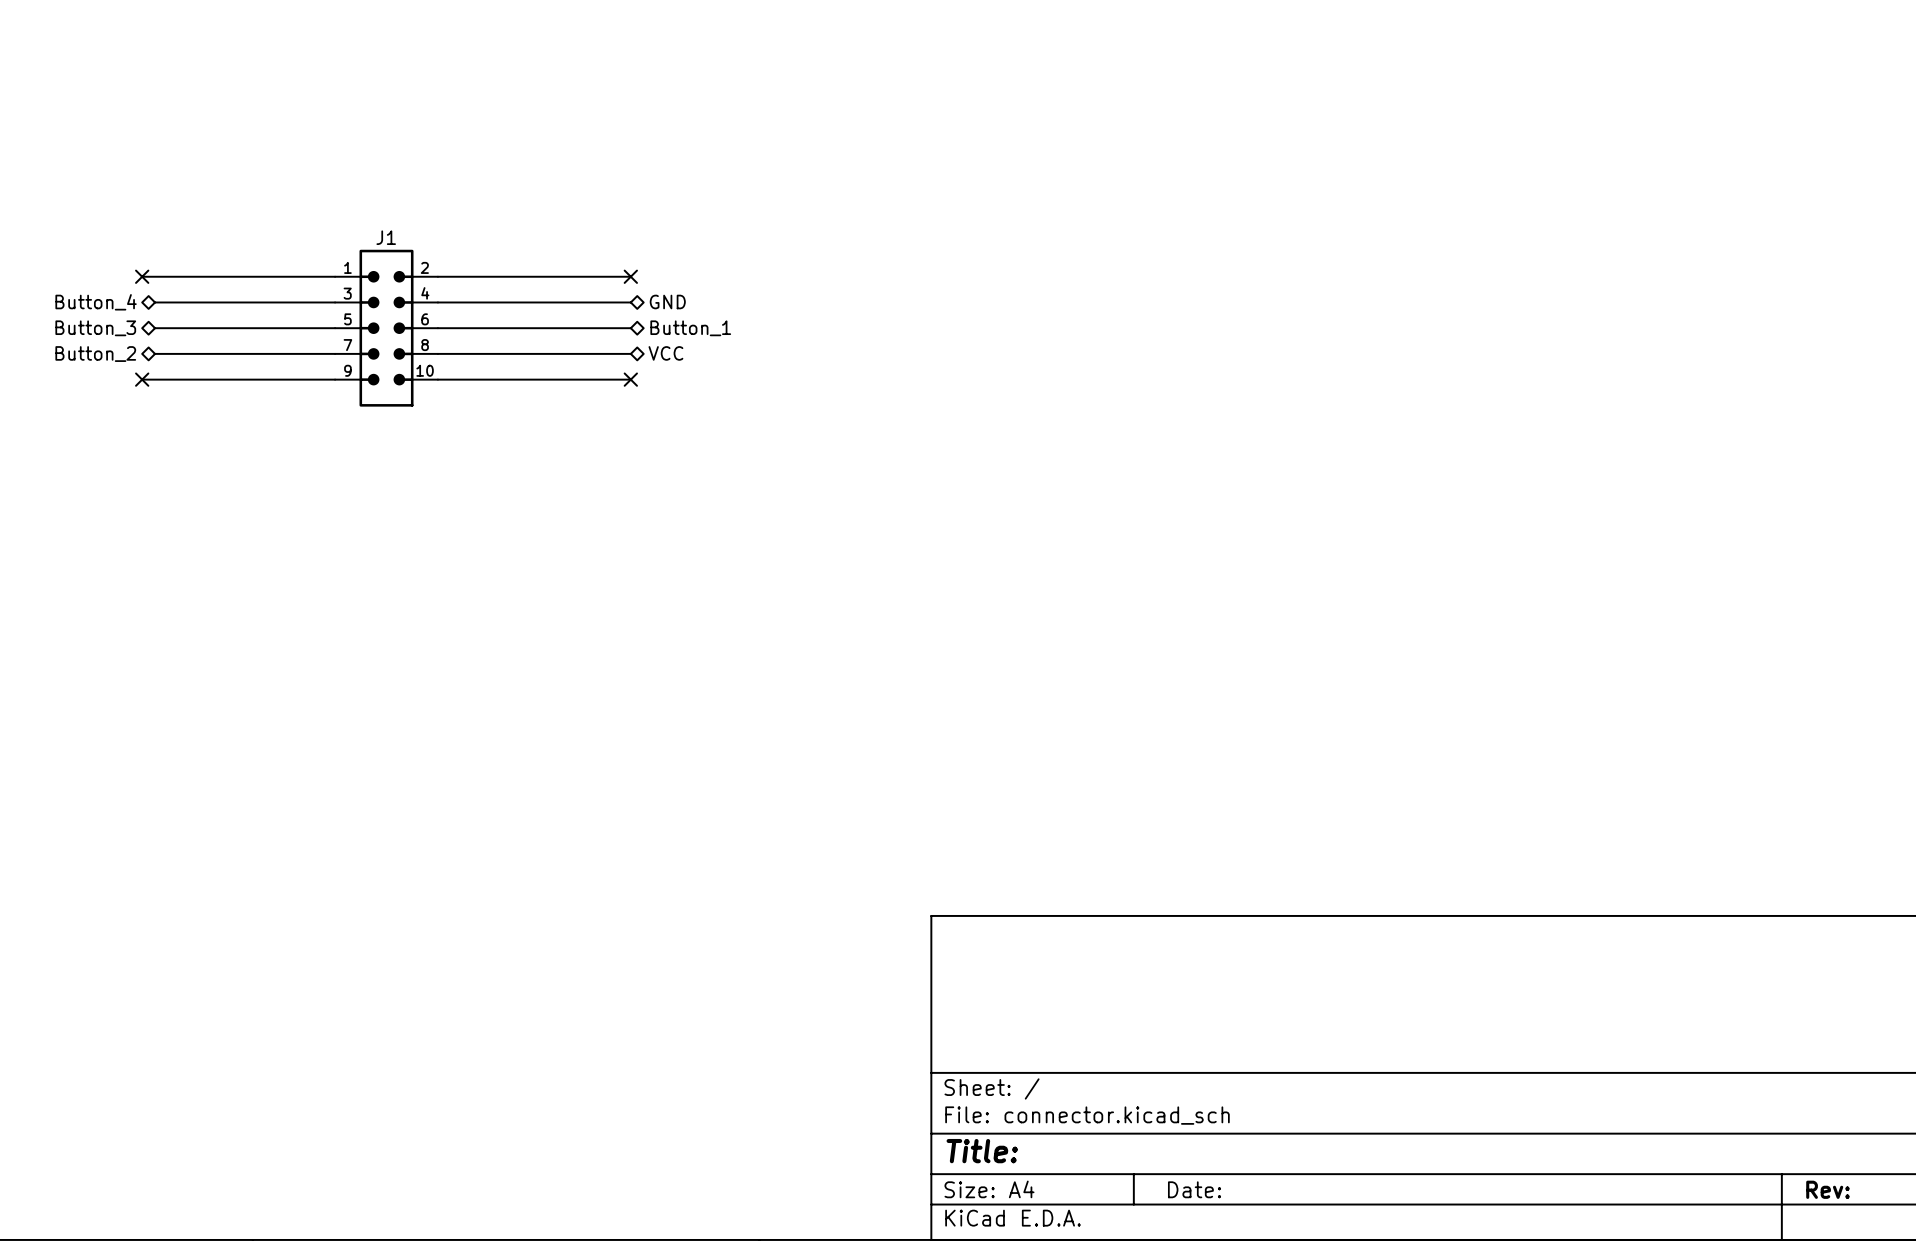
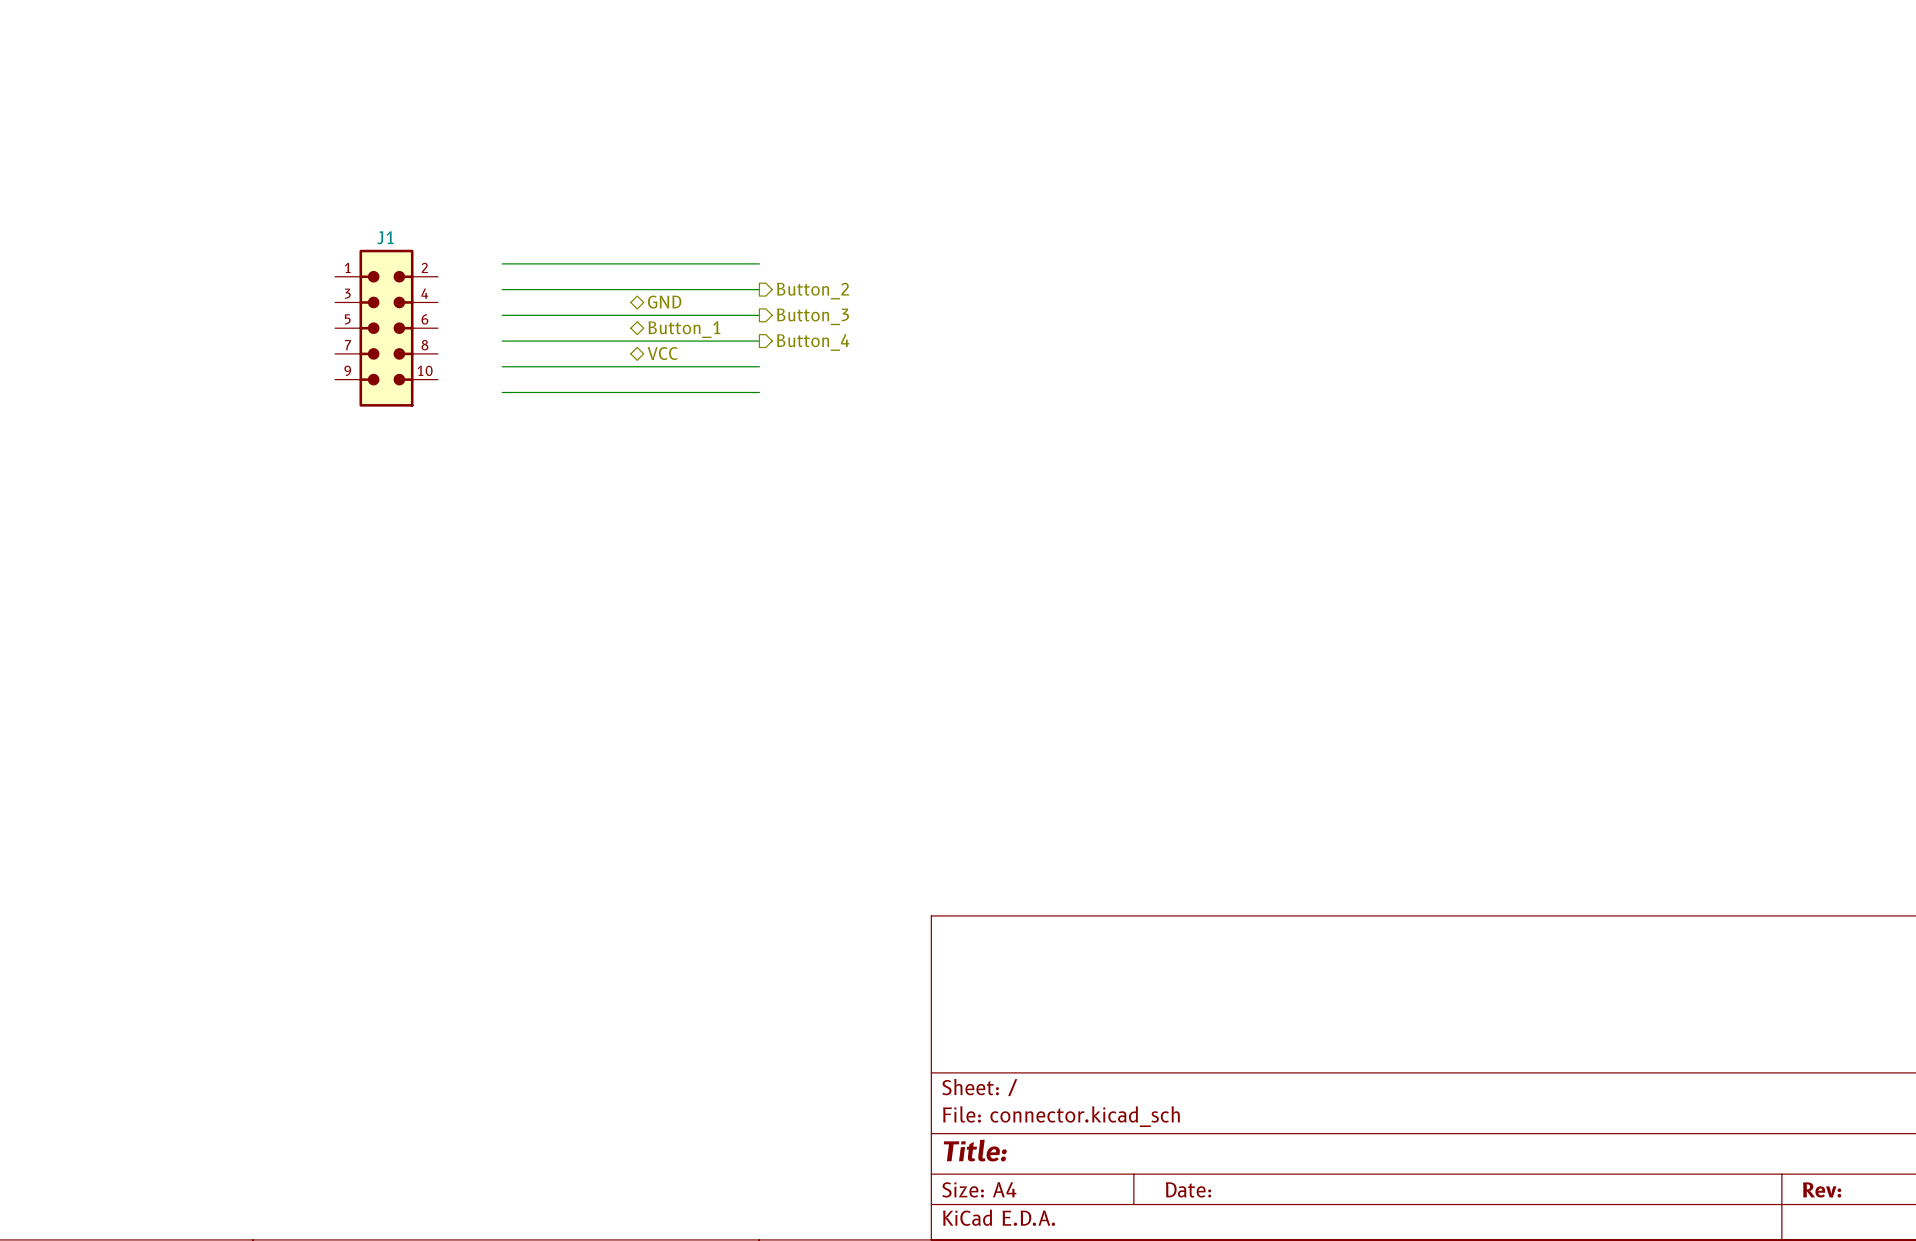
wire: none -> (502, 263) (759, 263)
wire: (142, 276) (335, 276) -> none
no-connect mark: (142, 276) -> none
wire: (437, 276) (630, 276) -> none
no-connect mark: (630, 276) -> none
wire: none -> (502, 289) (759, 289)
hierarchical label: none -> Button_2 (813, 291)
hierarchical label: Button_4 (96, 302) -> none
wire: (155, 302) (335, 302) -> none
wire: (437, 302) (630, 302) -> none
wire: none -> (502, 315) (759, 315)
hierarchical label: none -> Button_3 (813, 316)
hierarchical label: Button_3 (95, 328) -> none
wire: (155, 328) (335, 328) -> none
wire: (437, 328) (630, 328) -> none
hierarchical label: none -> Button_4 (813, 342)
wire: none -> (502, 341) (759, 341)
wire: (155, 353) (335, 353) -> none
wire: (437, 353) (630, 353) -> none
hierarchical label: Button_2 (95, 354) -> none
wire: none -> (502, 366) (759, 366)
wire: (142, 379) (335, 379) -> none
no-connect mark: (142, 379) -> none
wire: (437, 379) (630, 379) -> none
no-connect mark: (630, 379) -> none
wire: none -> (502, 392) (759, 392)

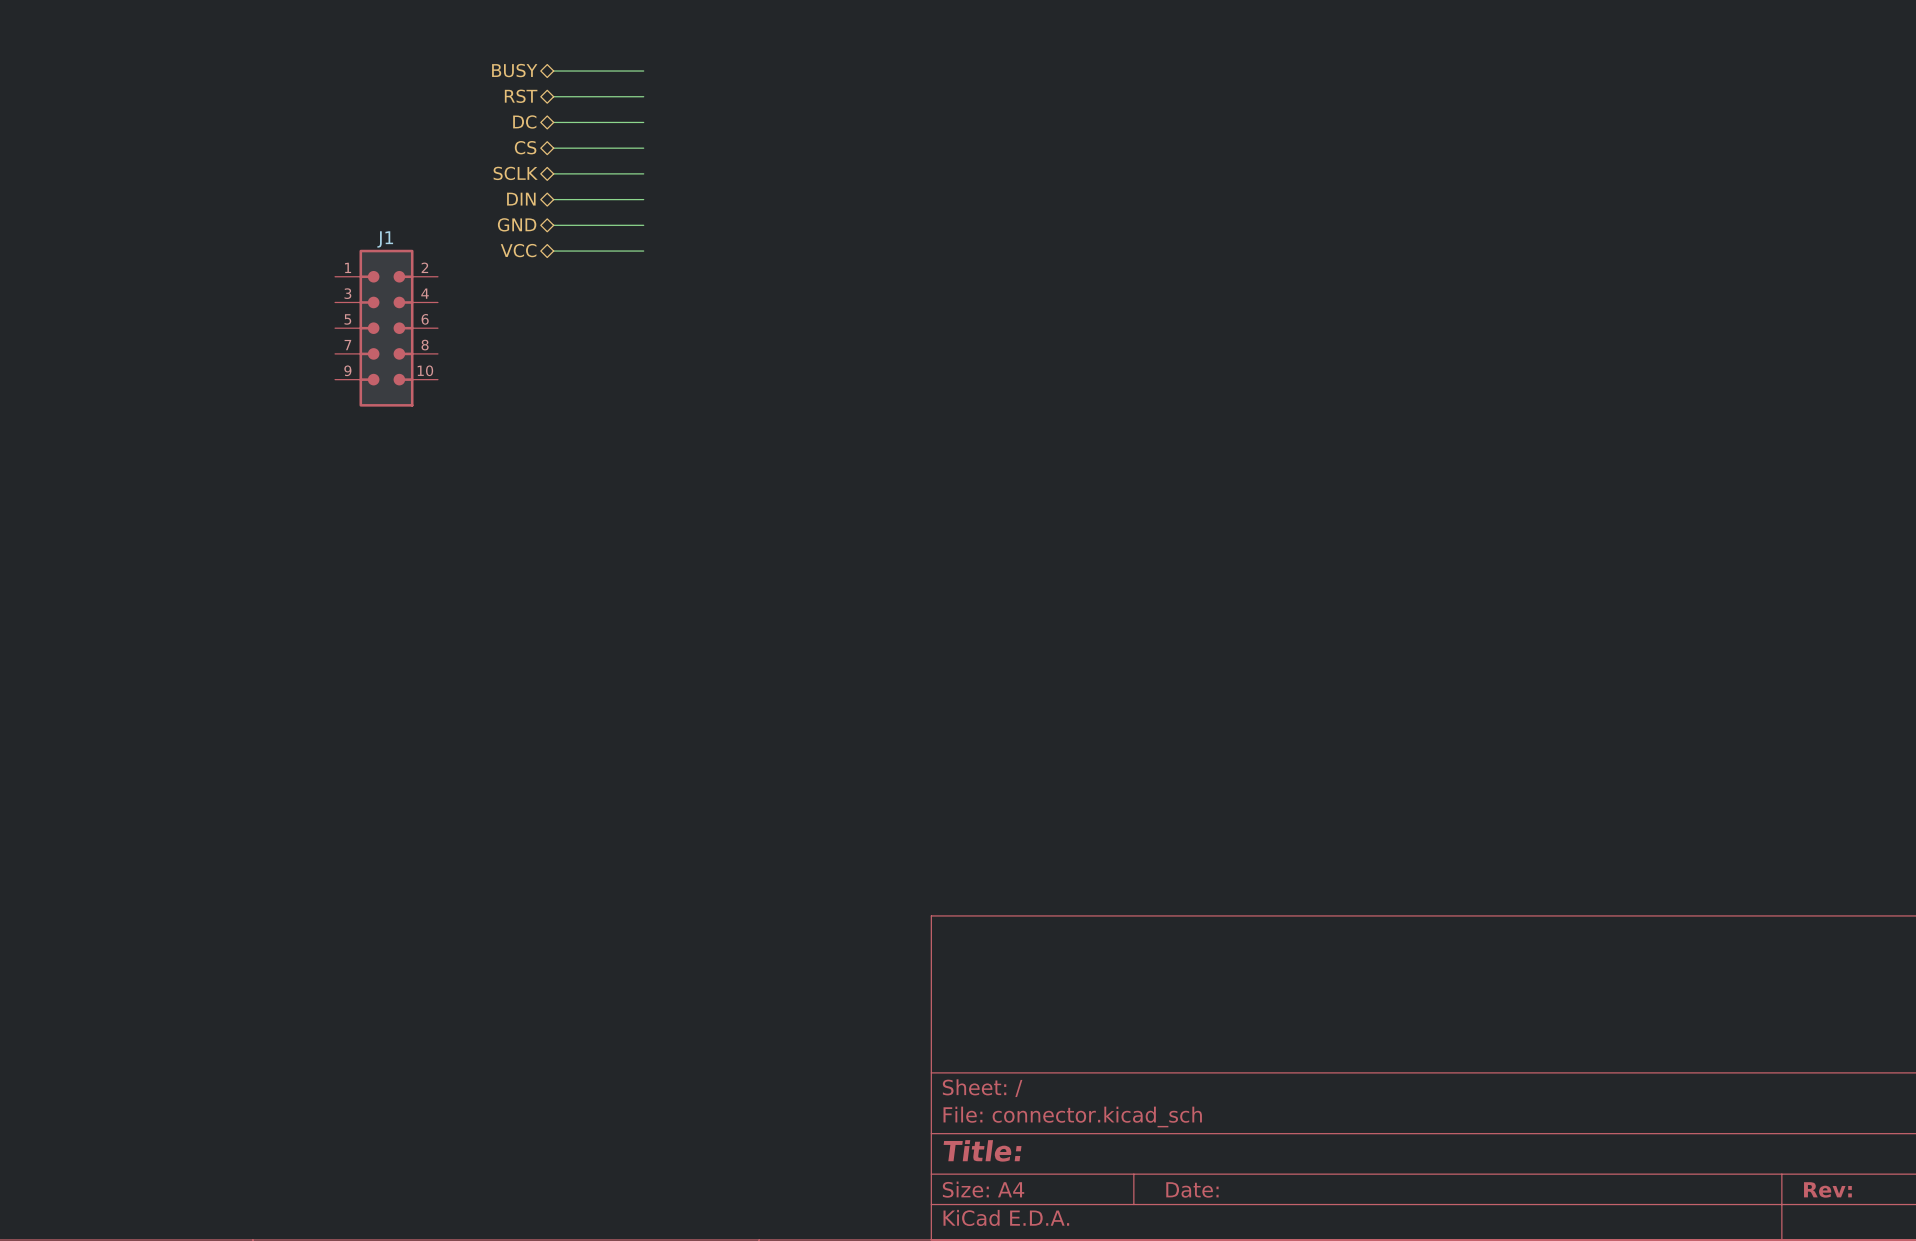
hierarchical label: none -> BUSY (514, 70)
wire: none -> (553, 71) (643, 71)
hierarchical label: none -> RST (521, 96)
wire: none -> (553, 96) (643, 96)
hierarchical label: none -> DC (524, 121)
wire: none -> (553, 122) (643, 122)
hierarchical label: none -> CS (525, 147)
wire: none -> (553, 148) (643, 148)
hierarchical label: none -> SCLK (515, 173)
wire: none -> (553, 173) (643, 173)
hierarchical label: none -> DIN (521, 199)
wire: none -> (553, 199) (643, 199)
wire: none -> (553, 225) (643, 225)
wire: none -> (553, 251) (643, 251)
wire: (502, 263) (759, 263) -> none
wire: (502, 289) (759, 289) -> none
hierarchical label: Button_2 (813, 291) -> none
hierarchical label rotation: 0° (664, 302) -> 180° (517, 224)
hierarchical label position: GND (664, 302) -> GND (517, 224)
wire: (502, 315) (759, 315) -> none
hierarchical label: Button_3 (813, 316) -> none
hierarchical label: Button_1 (684, 329) -> none
wire: (502, 341) (759, 341) -> none
hierarchical label: Button_4 (813, 342) -> none
hierarchical label rotation: 0° (662, 353) -> 180° (518, 250)
hierarchical label position: VCC (662, 353) -> VCC (518, 250)
wire: (502, 366) (759, 366) -> none
wire: (502, 392) (759, 392) -> none

